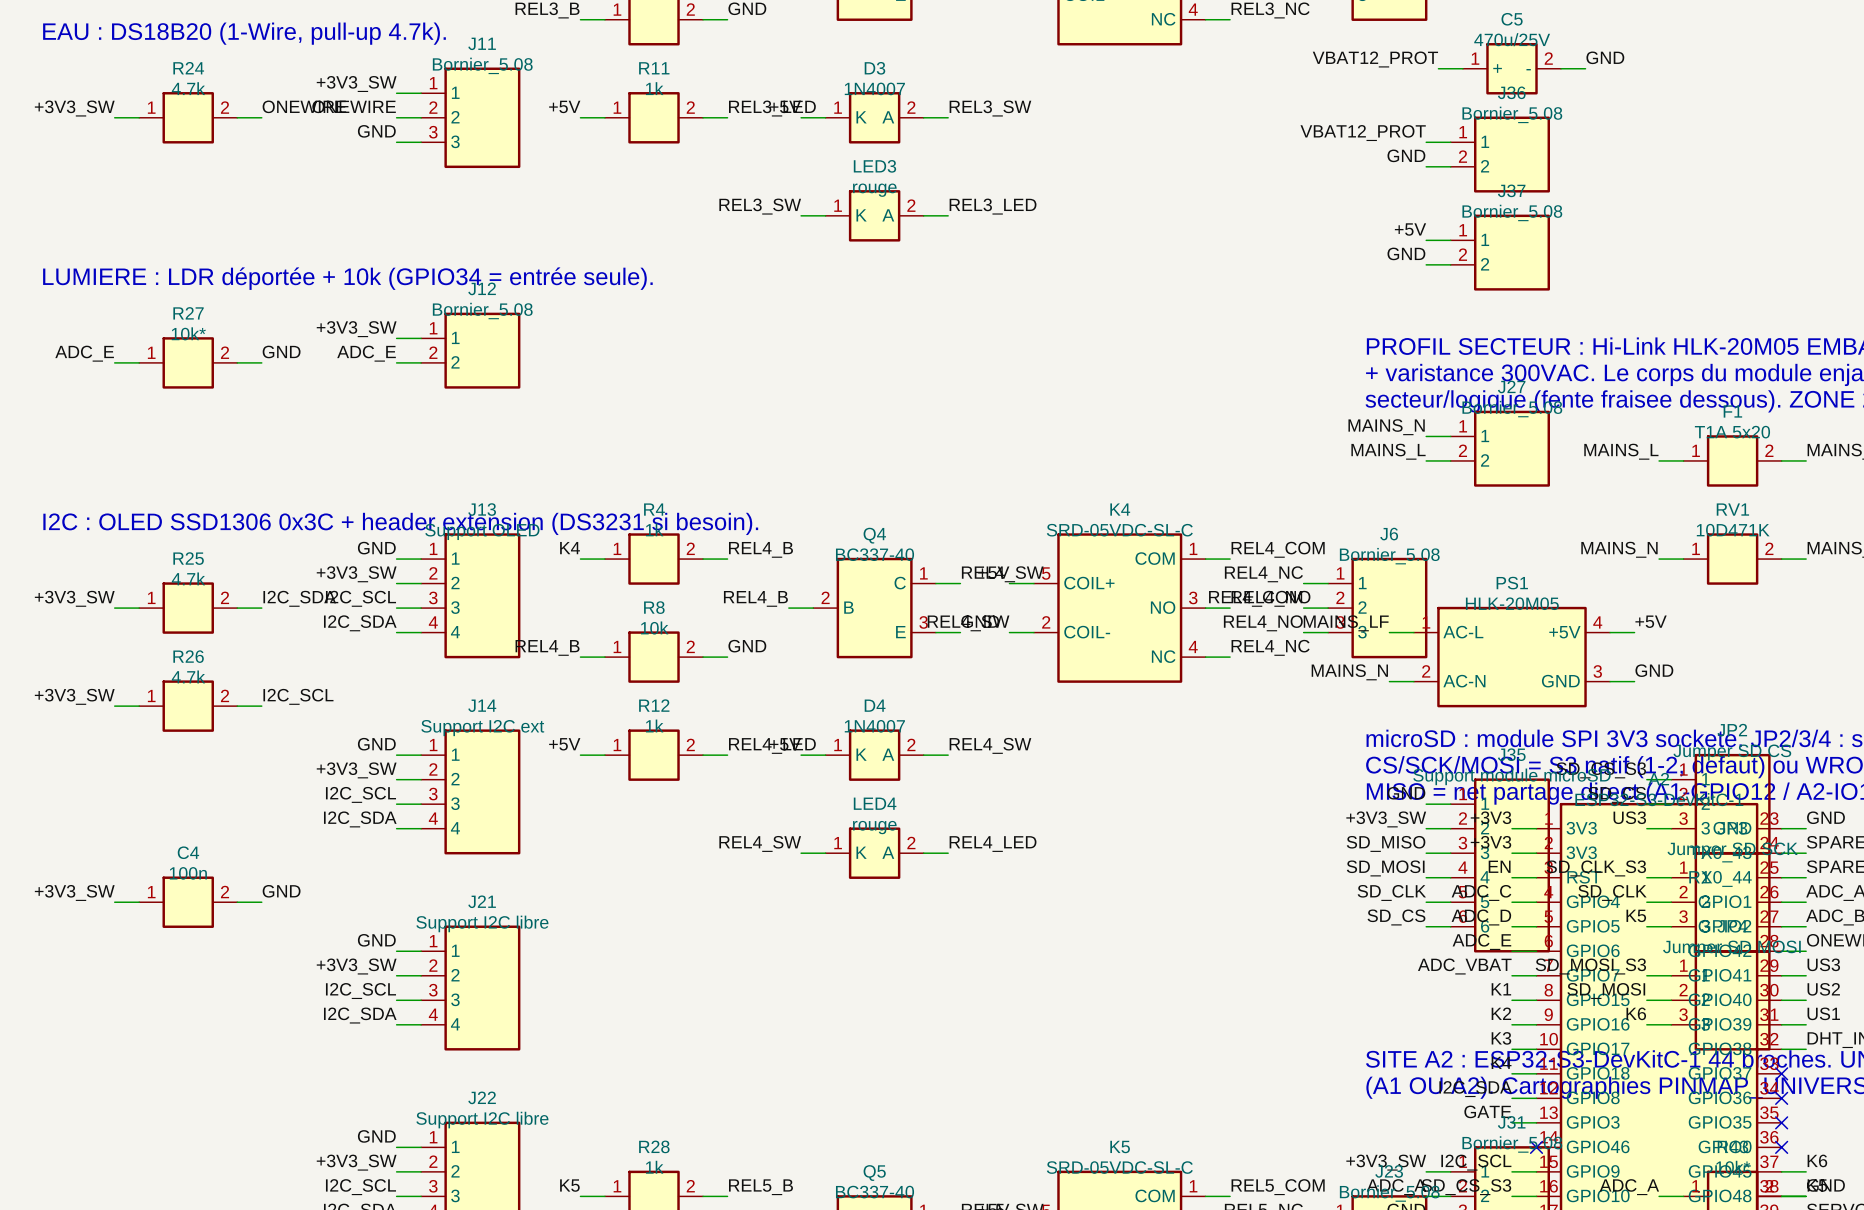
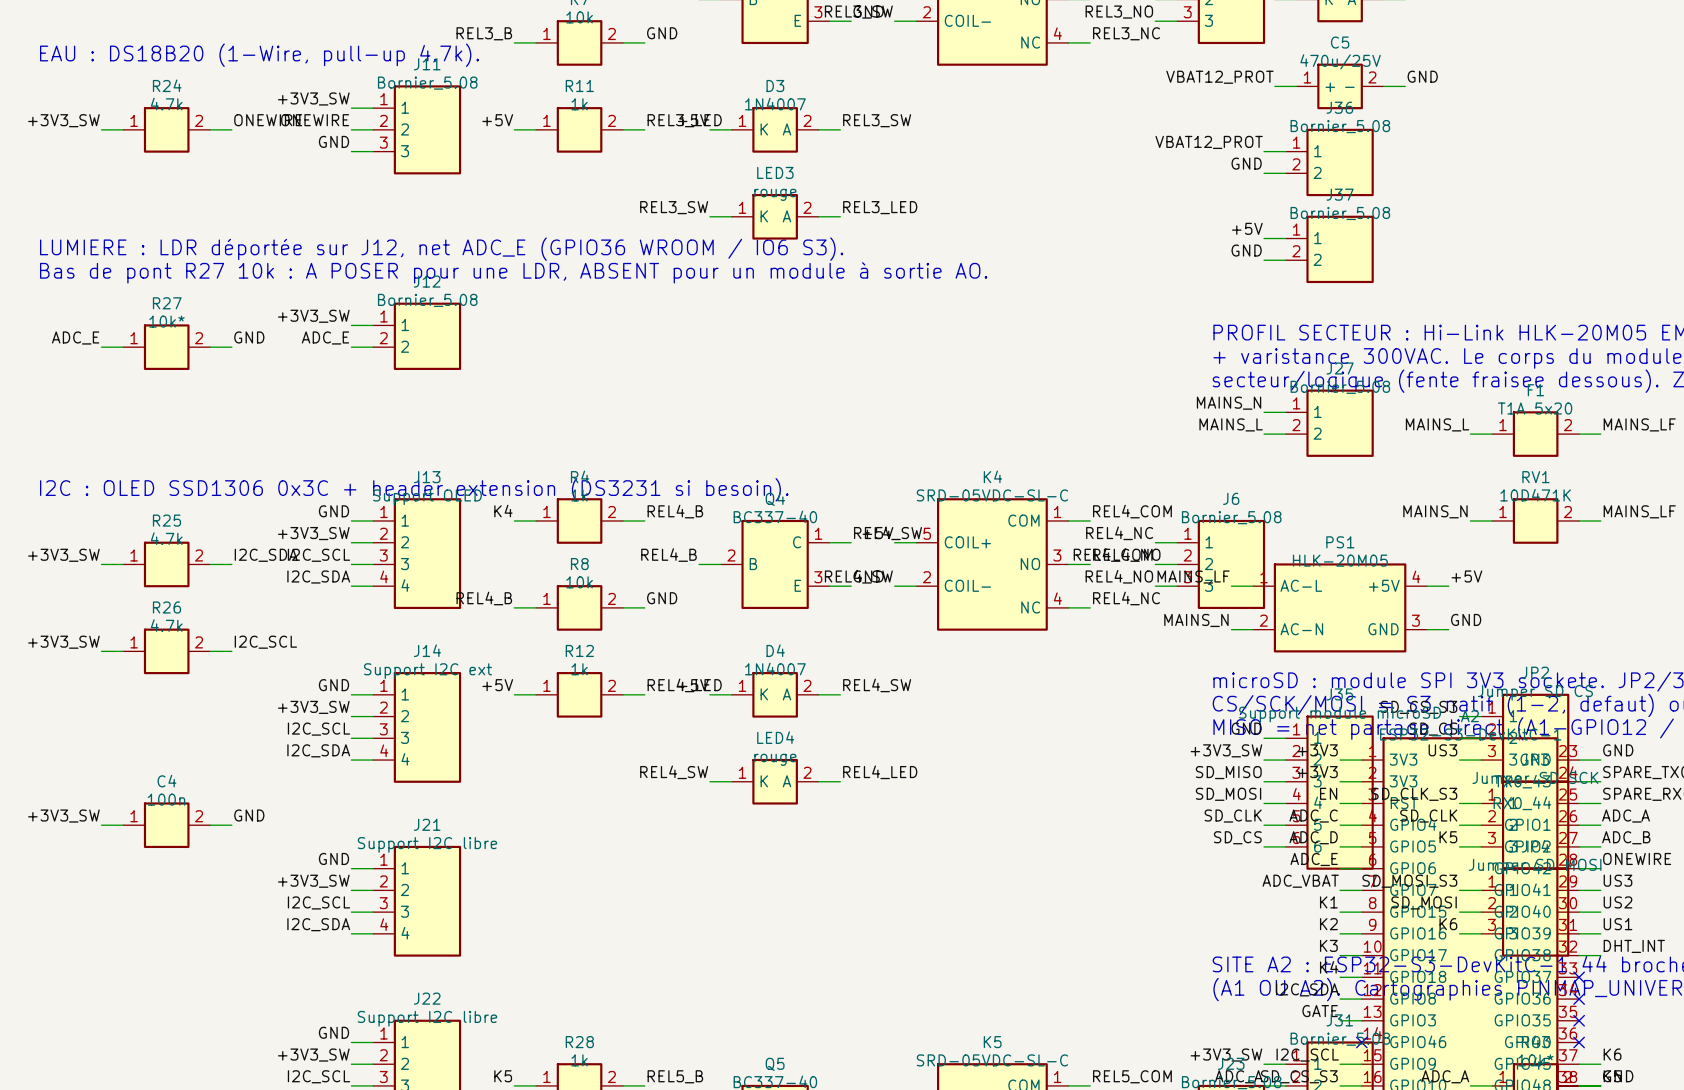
text: none -> LUMIERE : LDR déportée sur J12, net ADC_E (GPIO36 WROOM / IO6 S3). (441, 249)
text: LUMIERE : LDR déportée + 10k (GPIO34 = entrée seule). (347, 278) -> Bas de pont R27 10k : A POSER pour une LDR, ABSENT pour un module à sortie AO. (513, 272)

